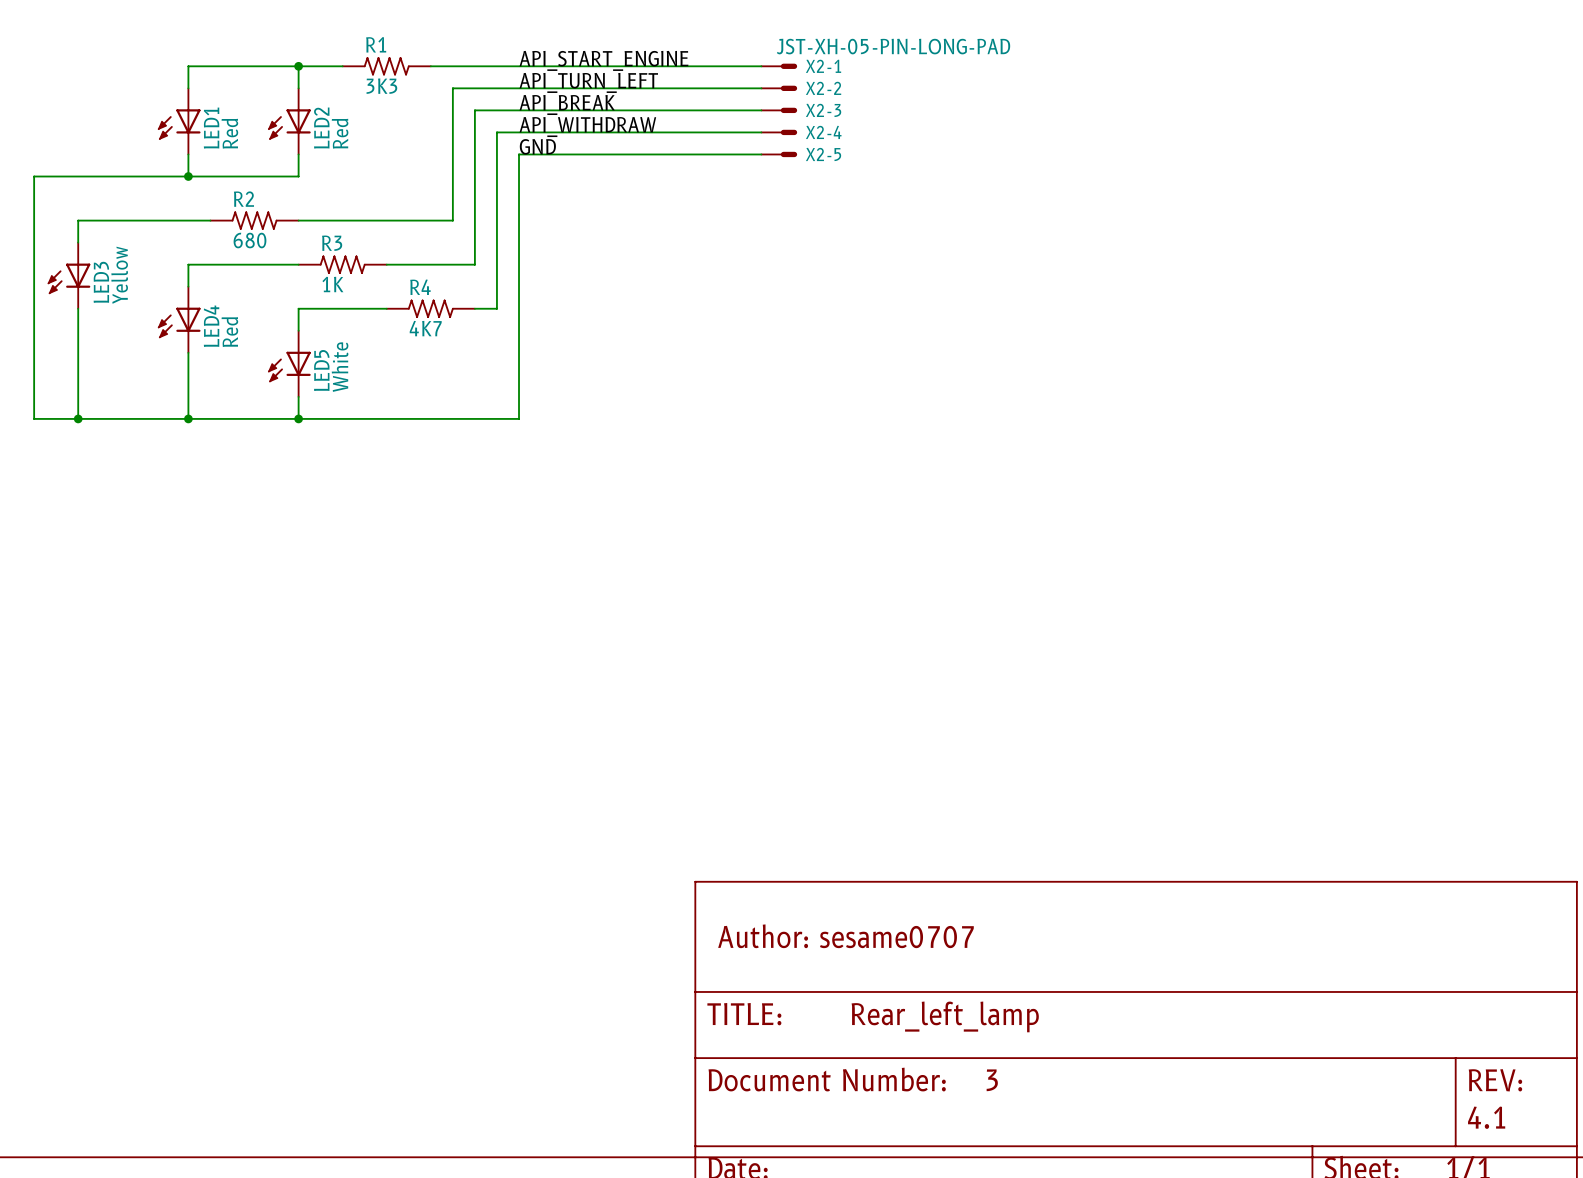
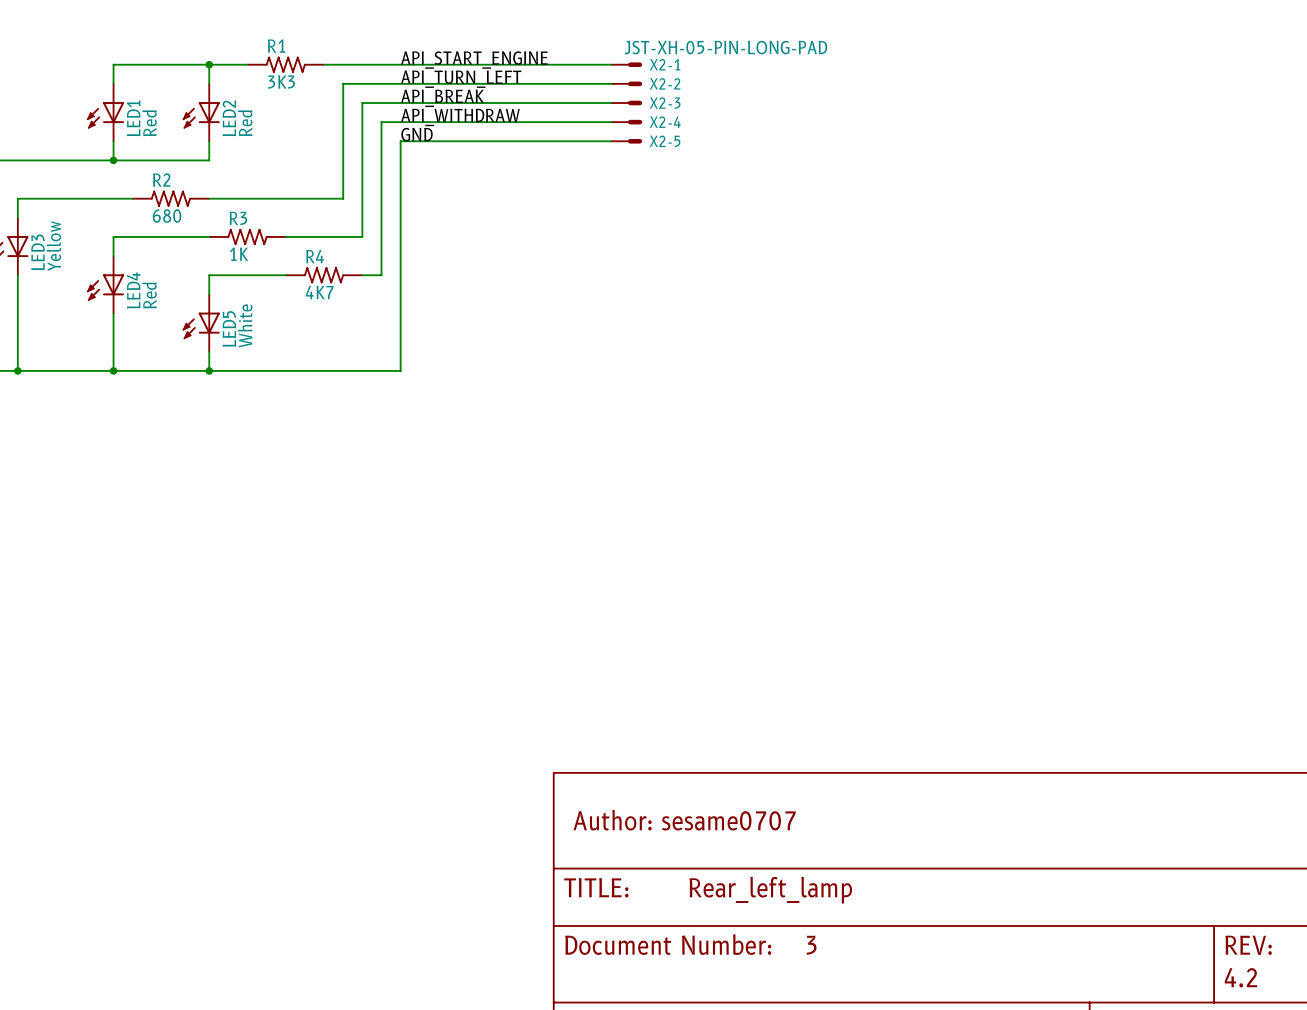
text: 4.1 (1486, 1117) -> 4.2 (1240, 977)

